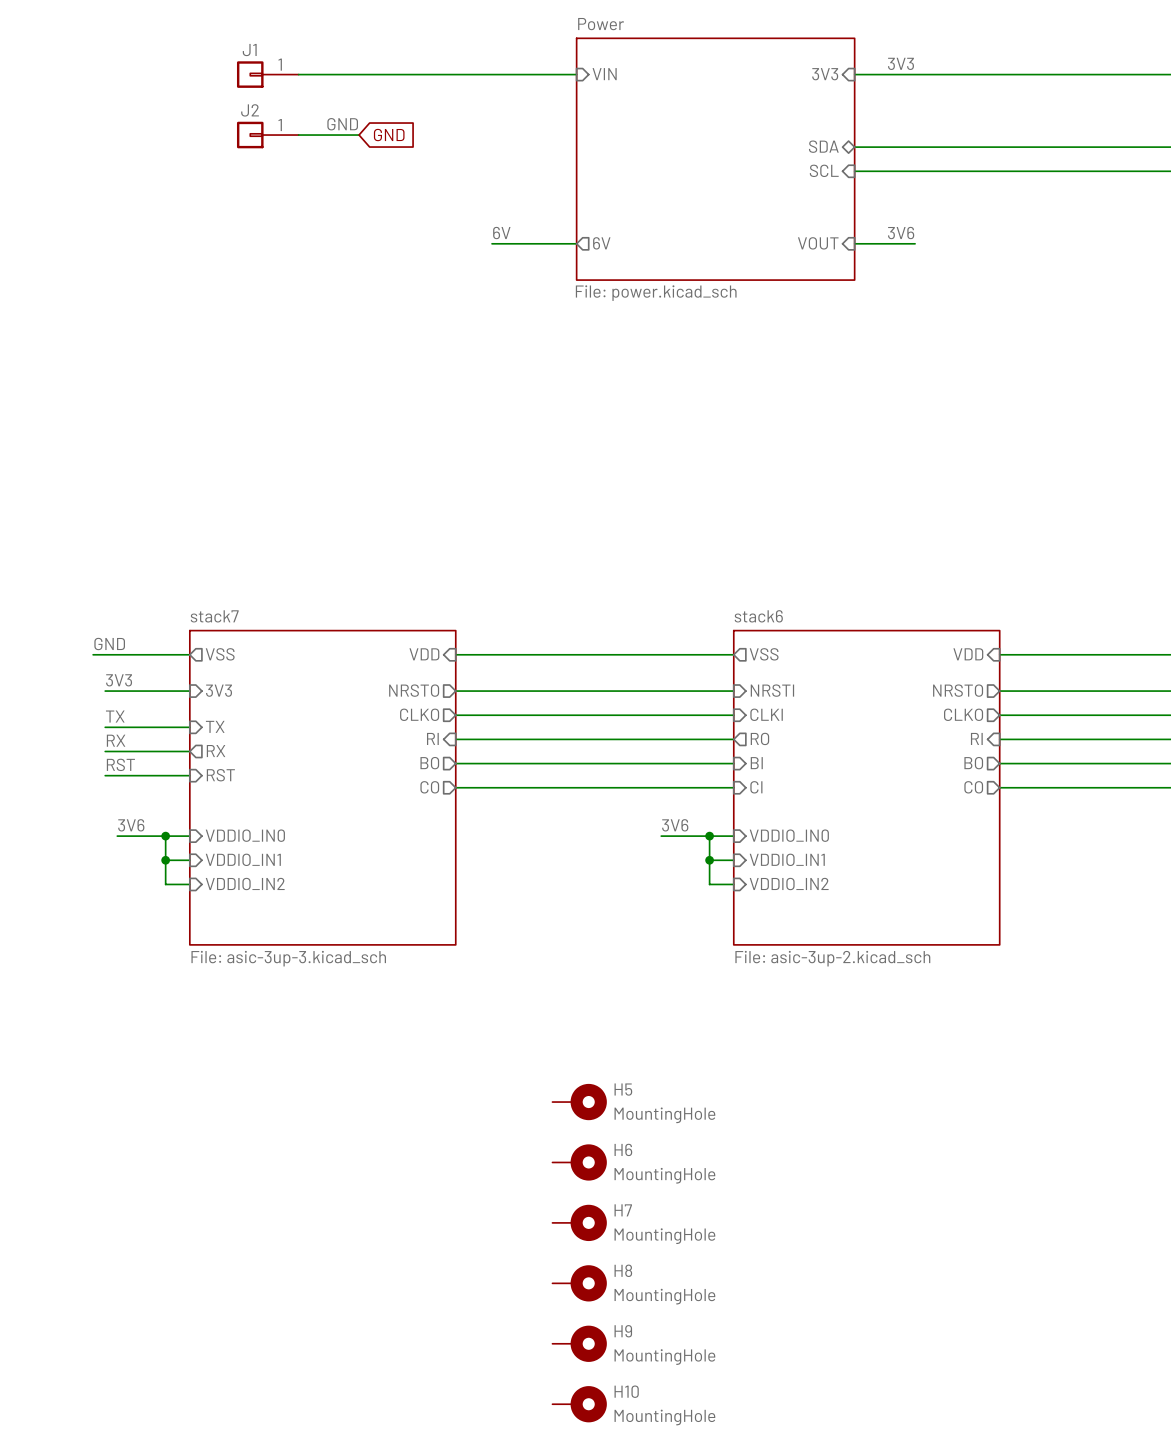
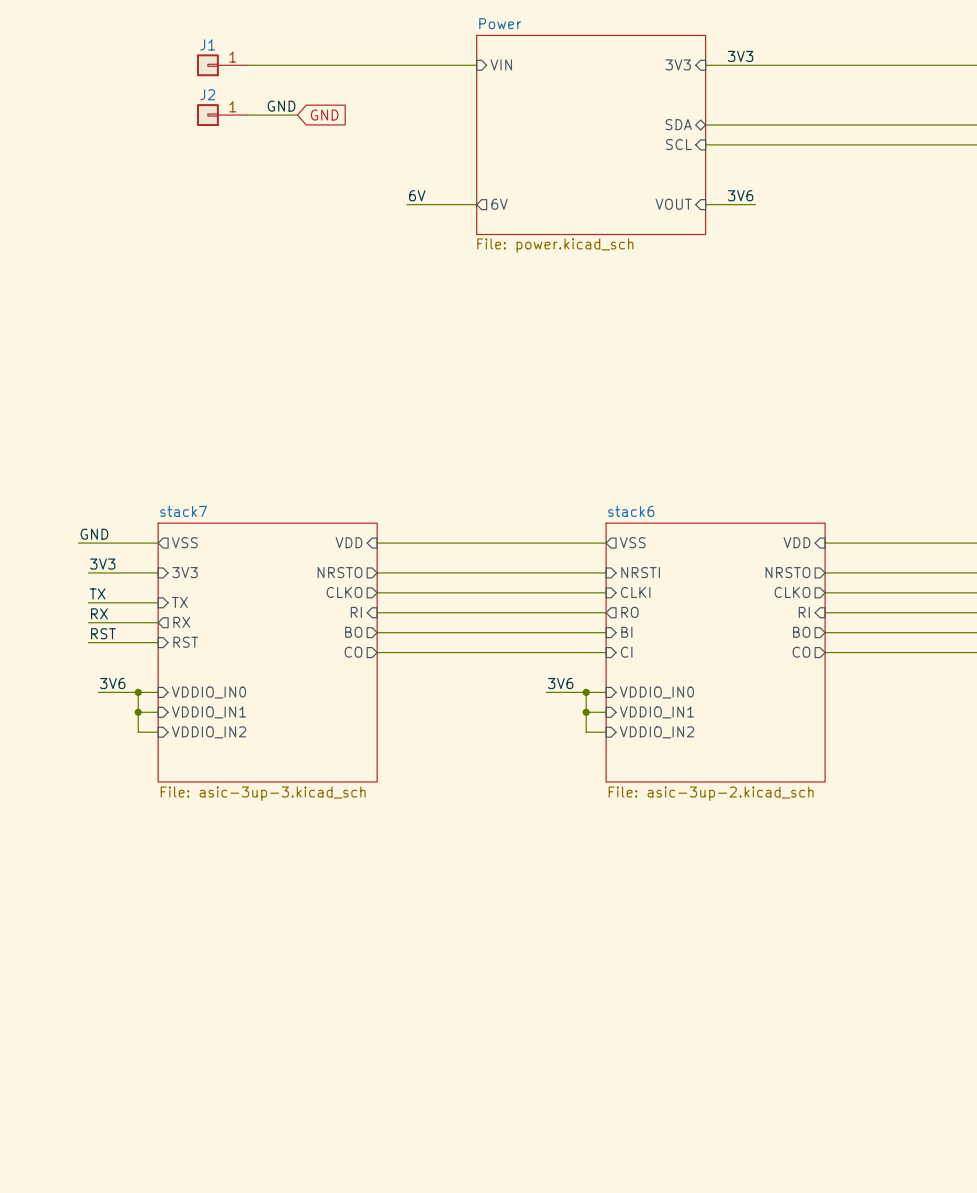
H5: MountingHole (579, 1102) -> none
H6: MountingHole (579, 1162) -> none
H7: MountingHole (579, 1222) -> none
H8: MountingHole (579, 1283) -> none
H9: MountingHole (579, 1343) -> none
H10: MountingHole (579, 1404) -> none

